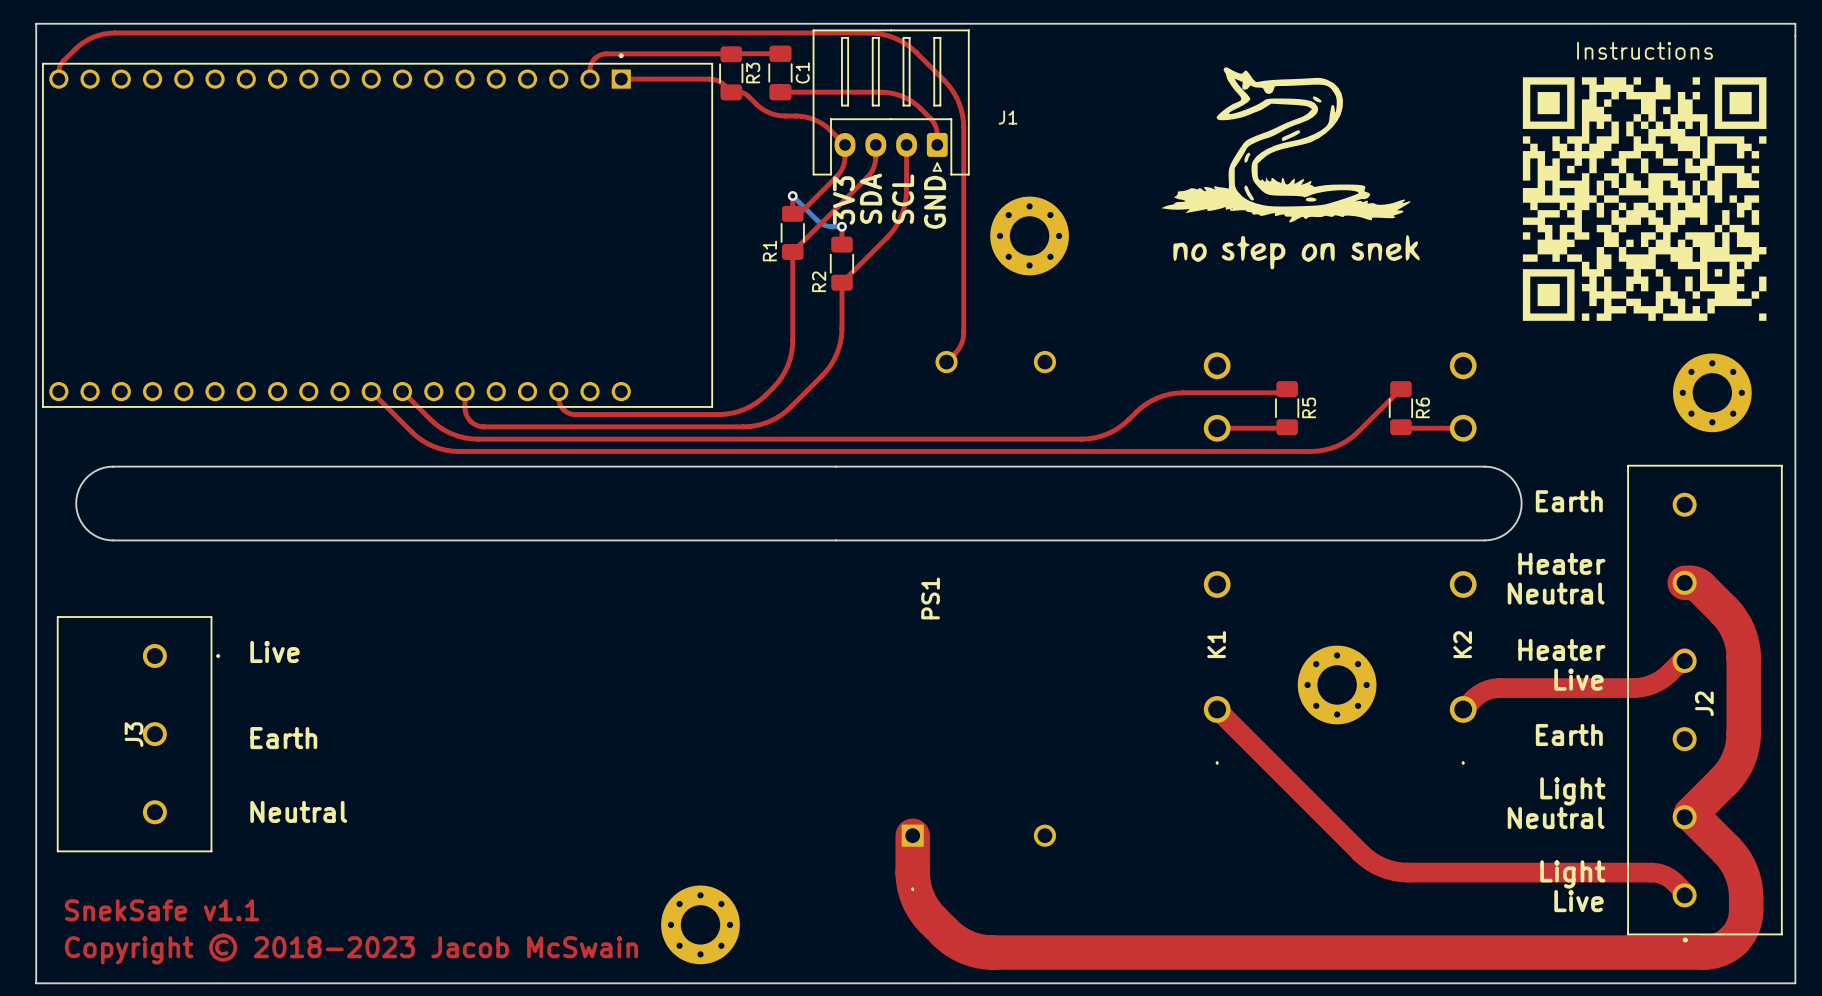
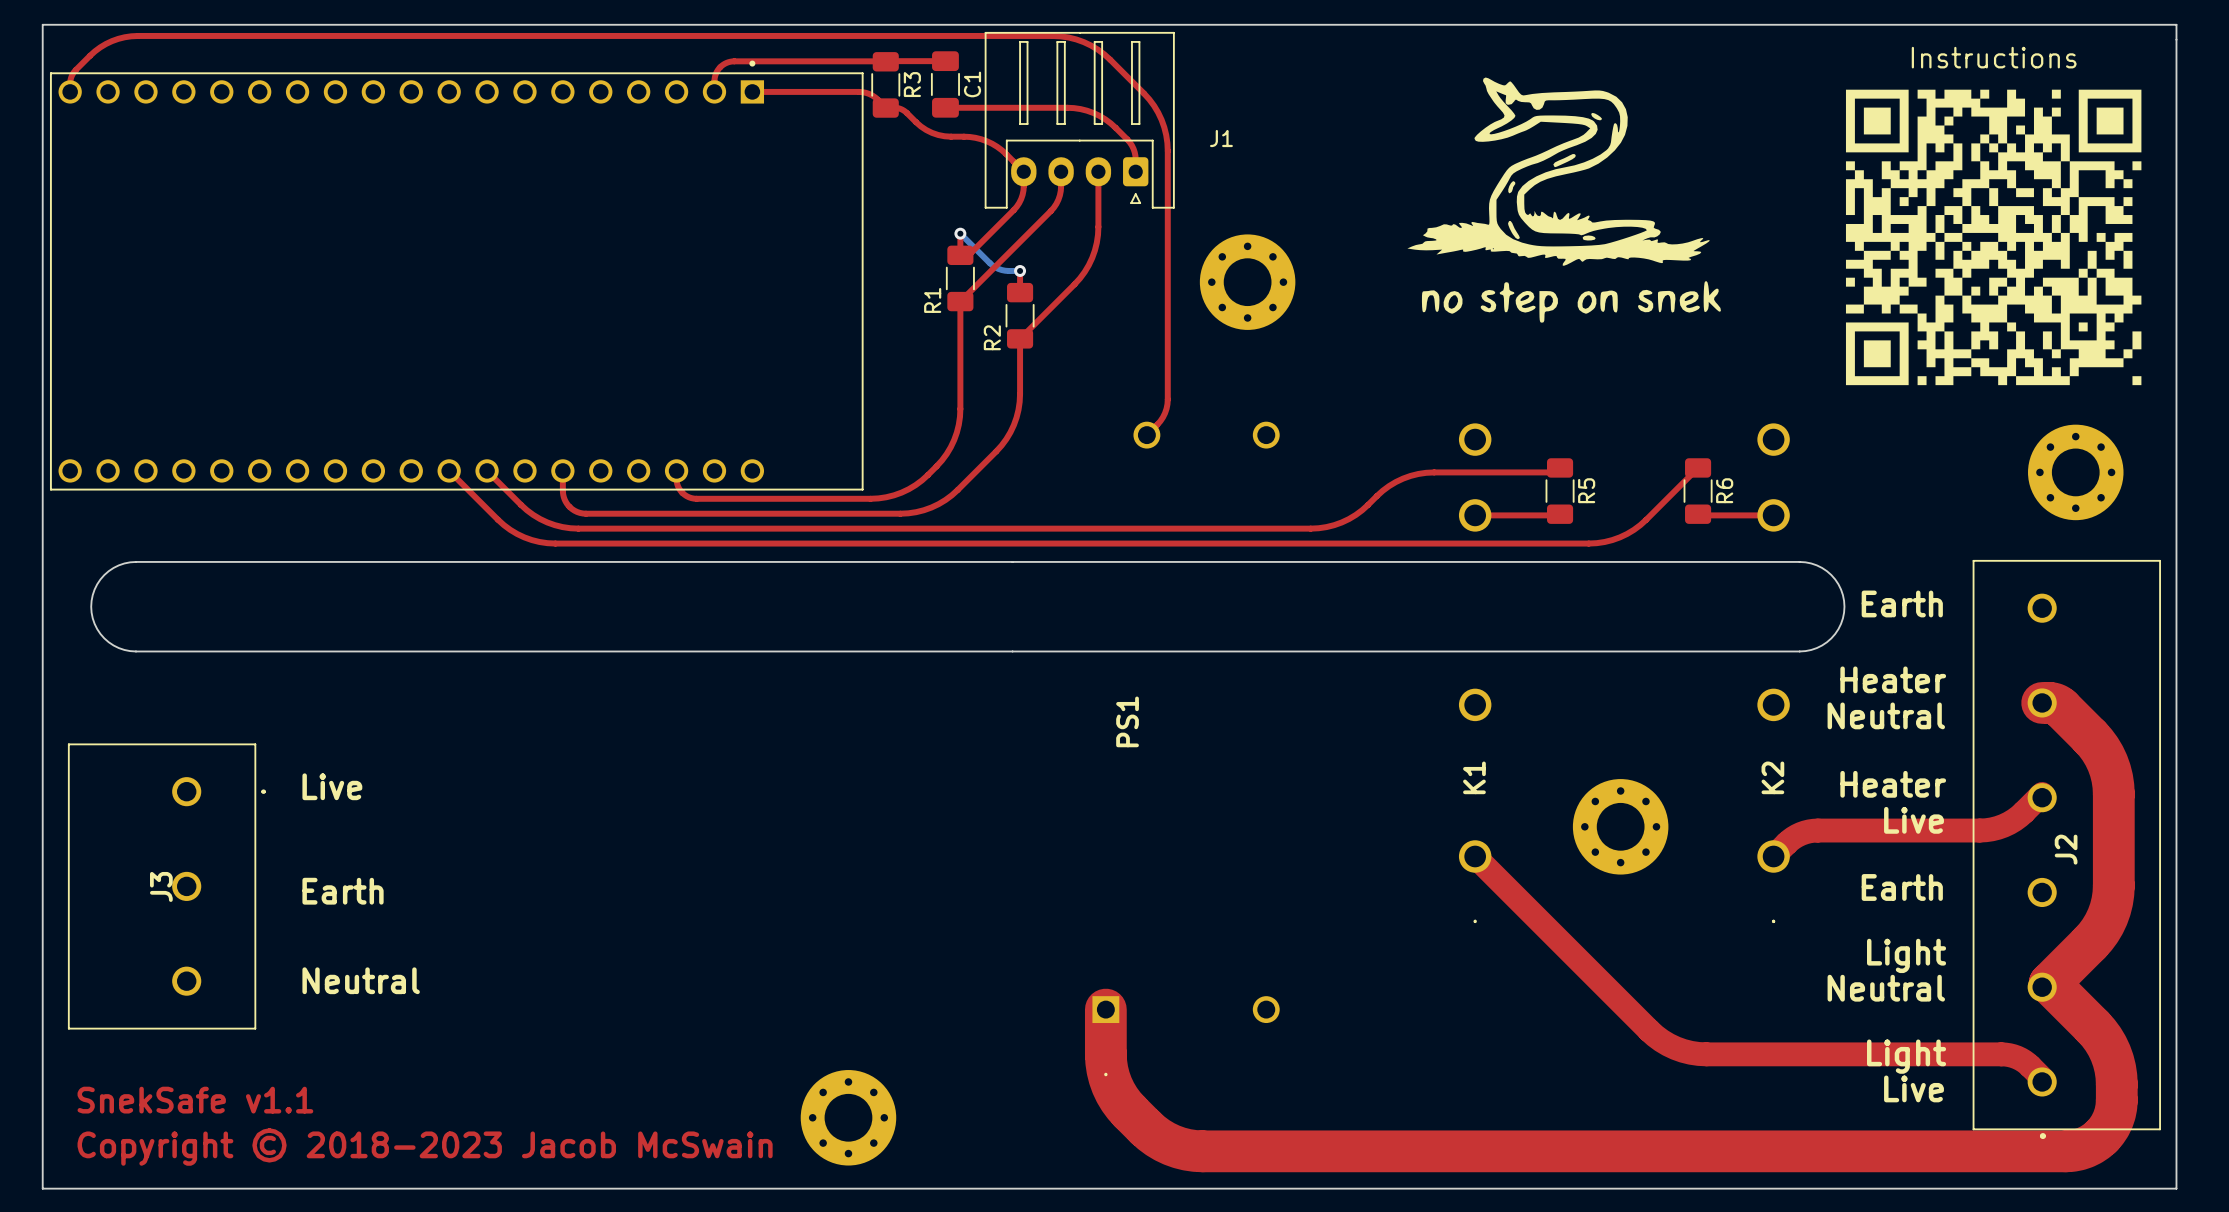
text: SDA (871, 198) -> none
text: SCL (903, 199) -> none
text: 3V3 (844, 200) -> none
text: GND (935, 202) -> none

